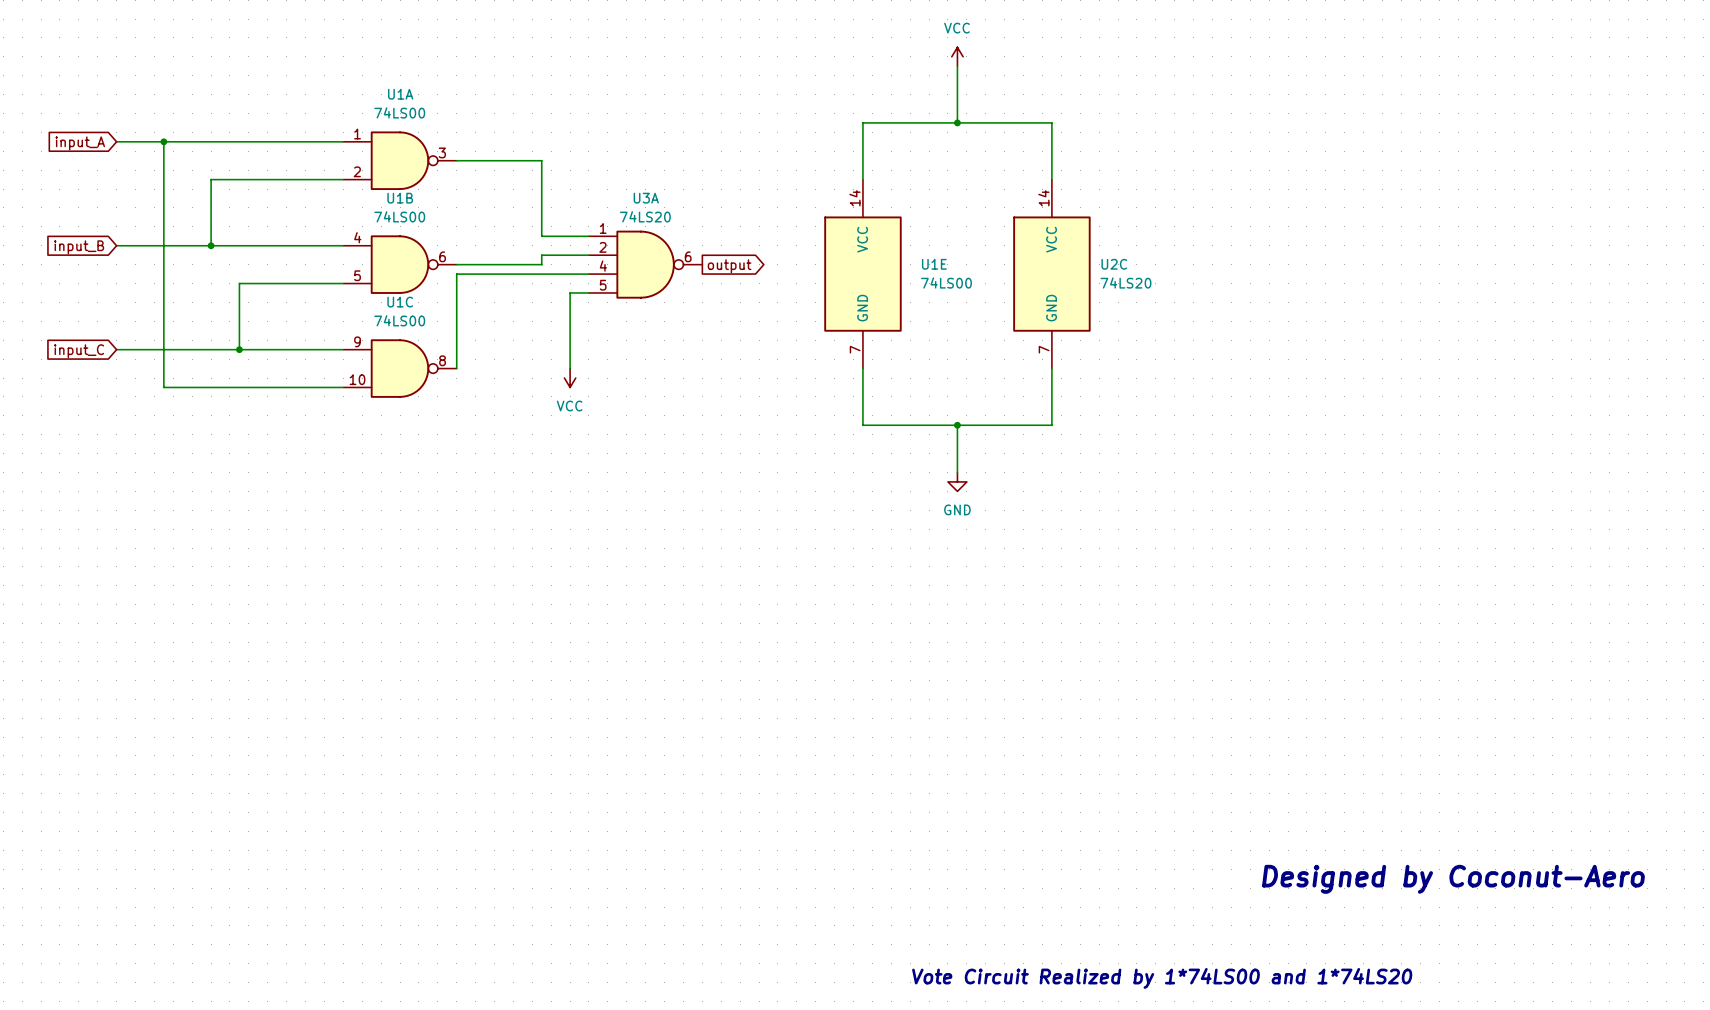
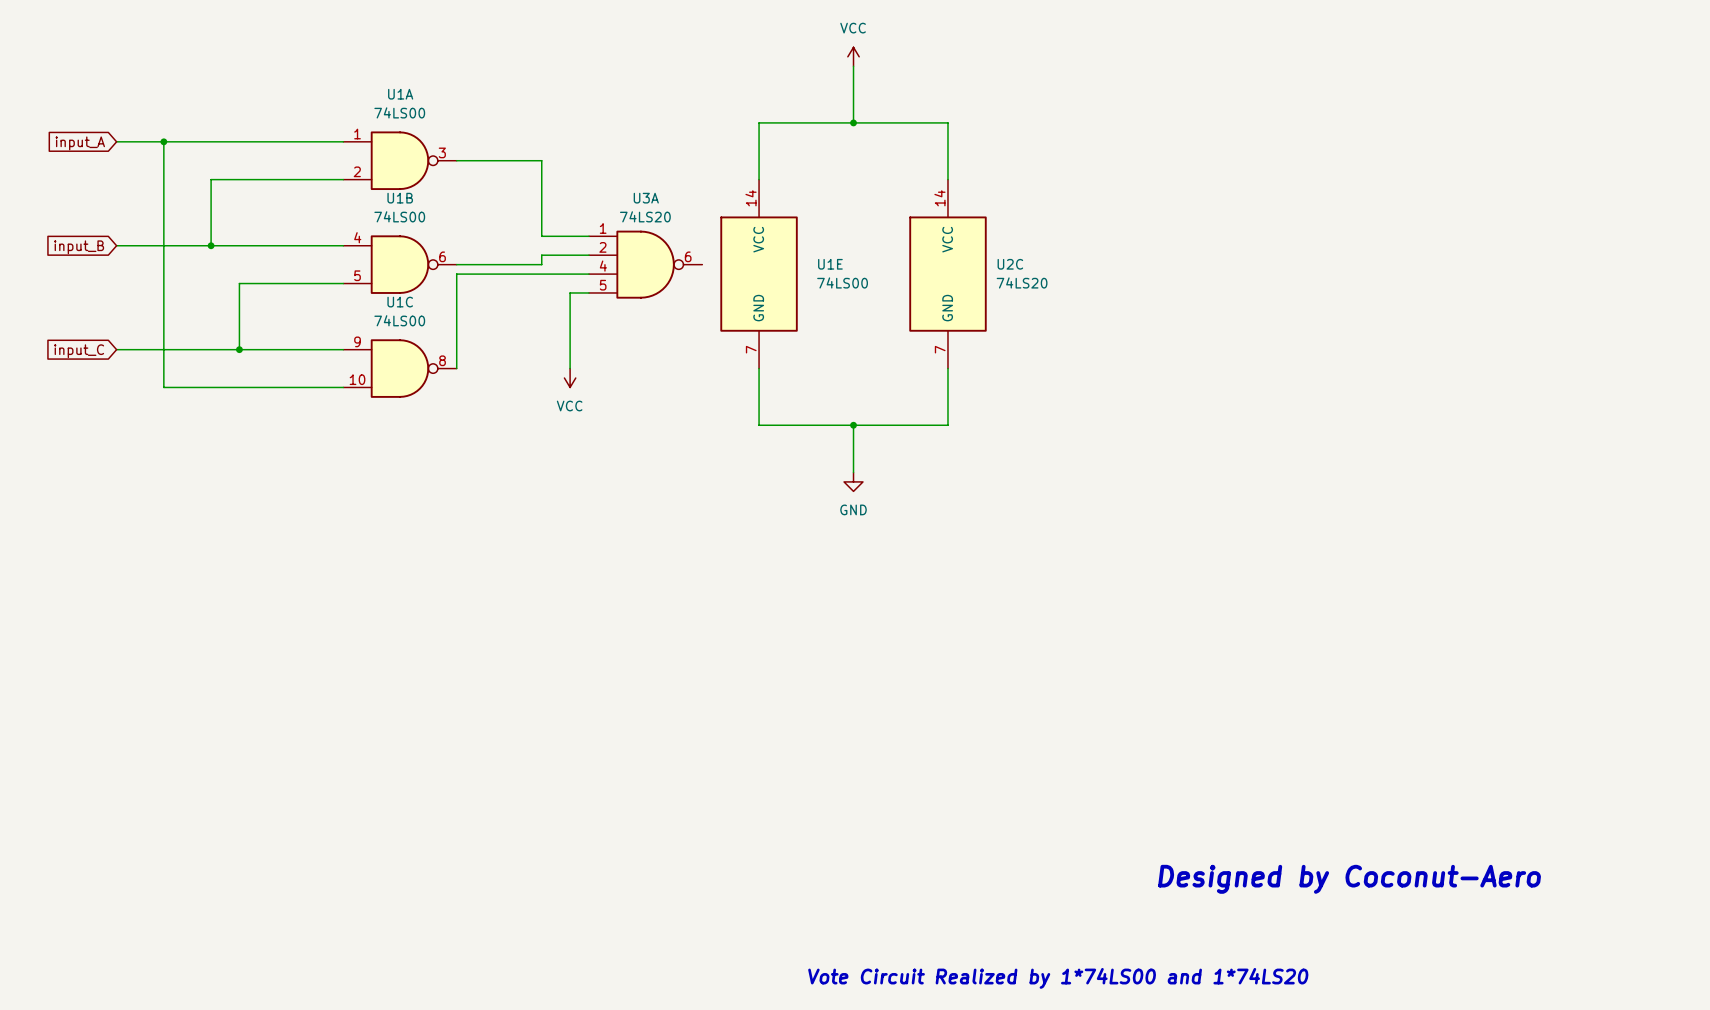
power symbol position: VCC (957, 56) -> VCC (853, 56)
wire: (957, 66) (957, 122) -> (853, 66) (853, 122)
junction: none -> (853, 122)
wire: (862, 122) (862, 179) -> (862, 122) (759, 122) (759, 179)
wire: (947, 122) (1051, 122) (1051, 179) -> (947, 122) (947, 179)
junction: (957, 122) -> none
global label: output (729, 266) -> none
U1E position: (862, 274) -> (759, 274)
U2C position: (1051, 274) -> (947, 274)
wire: (862, 368) (862, 425) -> (759, 368) (759, 425) (862, 425)
wire: (1051, 368) (1051, 425) (947, 425) -> (947, 368) (947, 425)
junction: none -> (853, 425)
wire: (957, 425) (957, 472) -> (853, 425) (853, 472)
junction: (957, 425) -> none
power symbol position: GND (957, 481) -> GND (853, 481)
text position: Designed by Coconut-Aero (1453, 879) -> Designed by Coconut-Aero (1349, 879)
text position: Vote Circuit Realized by 1*74LS00 and 1*74LS20 (1162, 978) -> Vote Circuit Realized by 1*74LS00 and 1*74LS20 (1058, 978)

